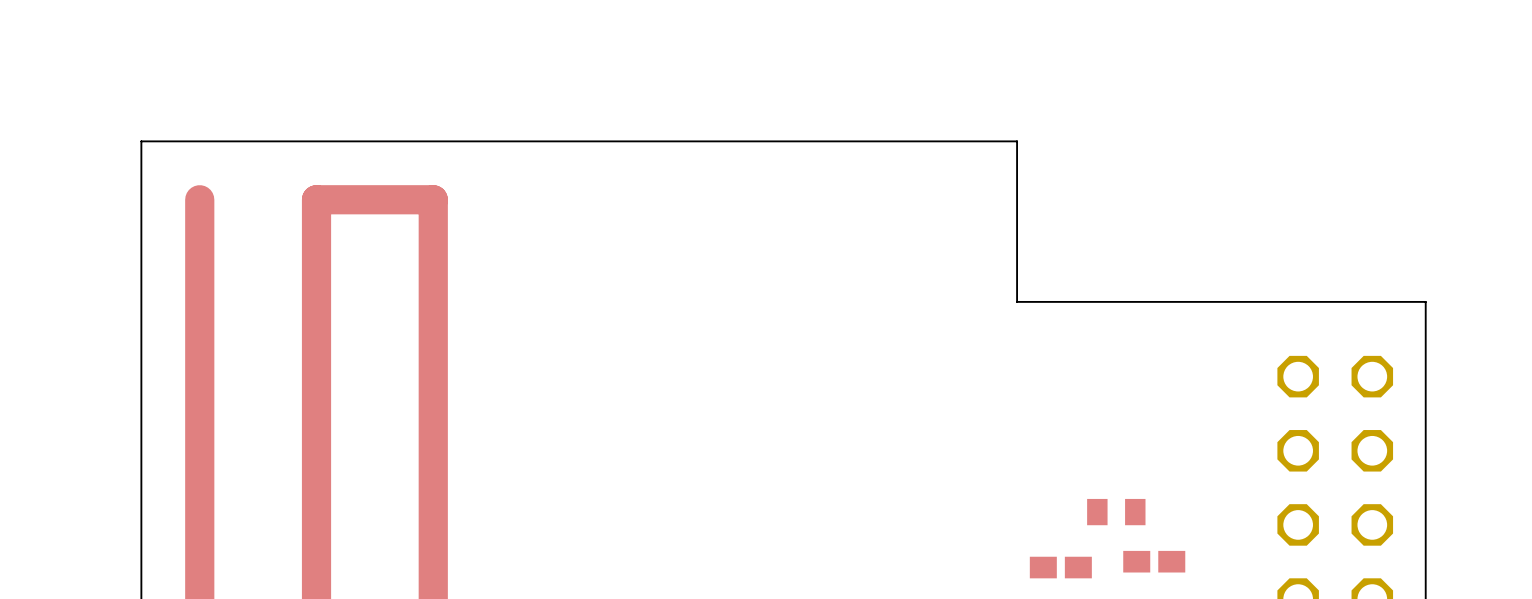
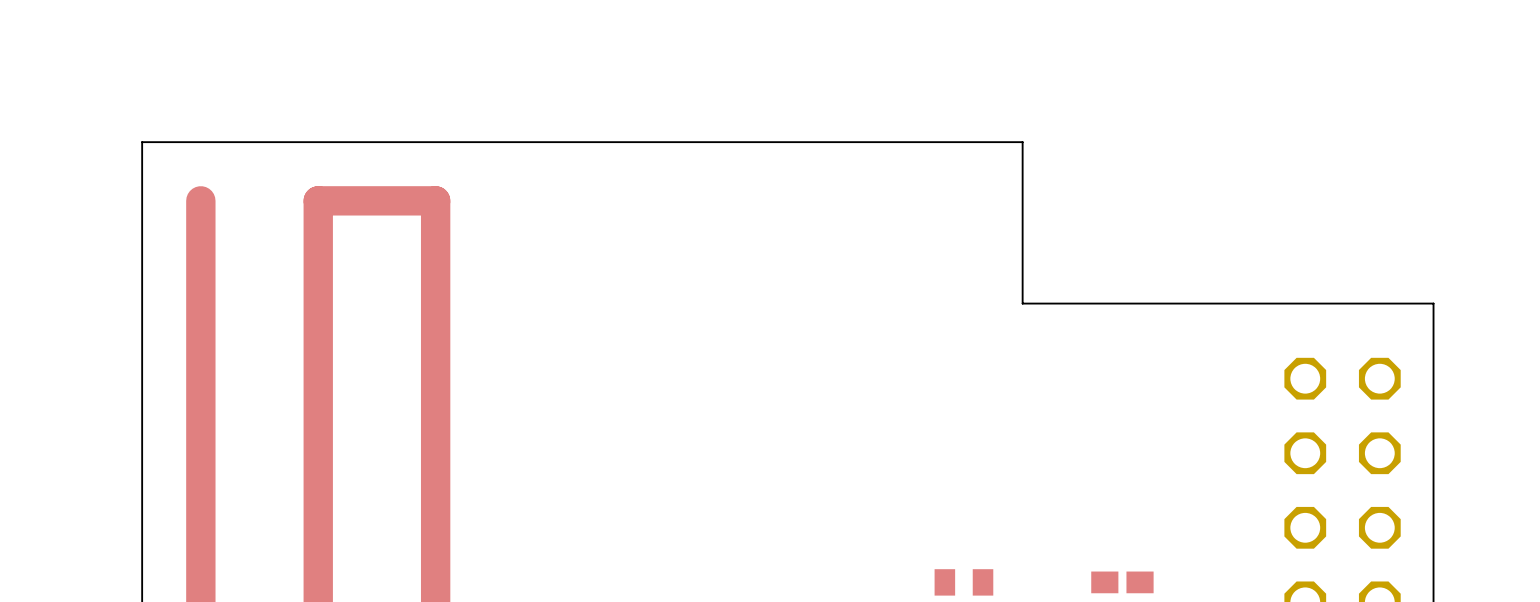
part position: (1116, 512) -> (963, 582)
part: (1154, 561) -> none
part: (1060, 567) -> none
part: none -> (1122, 582)

